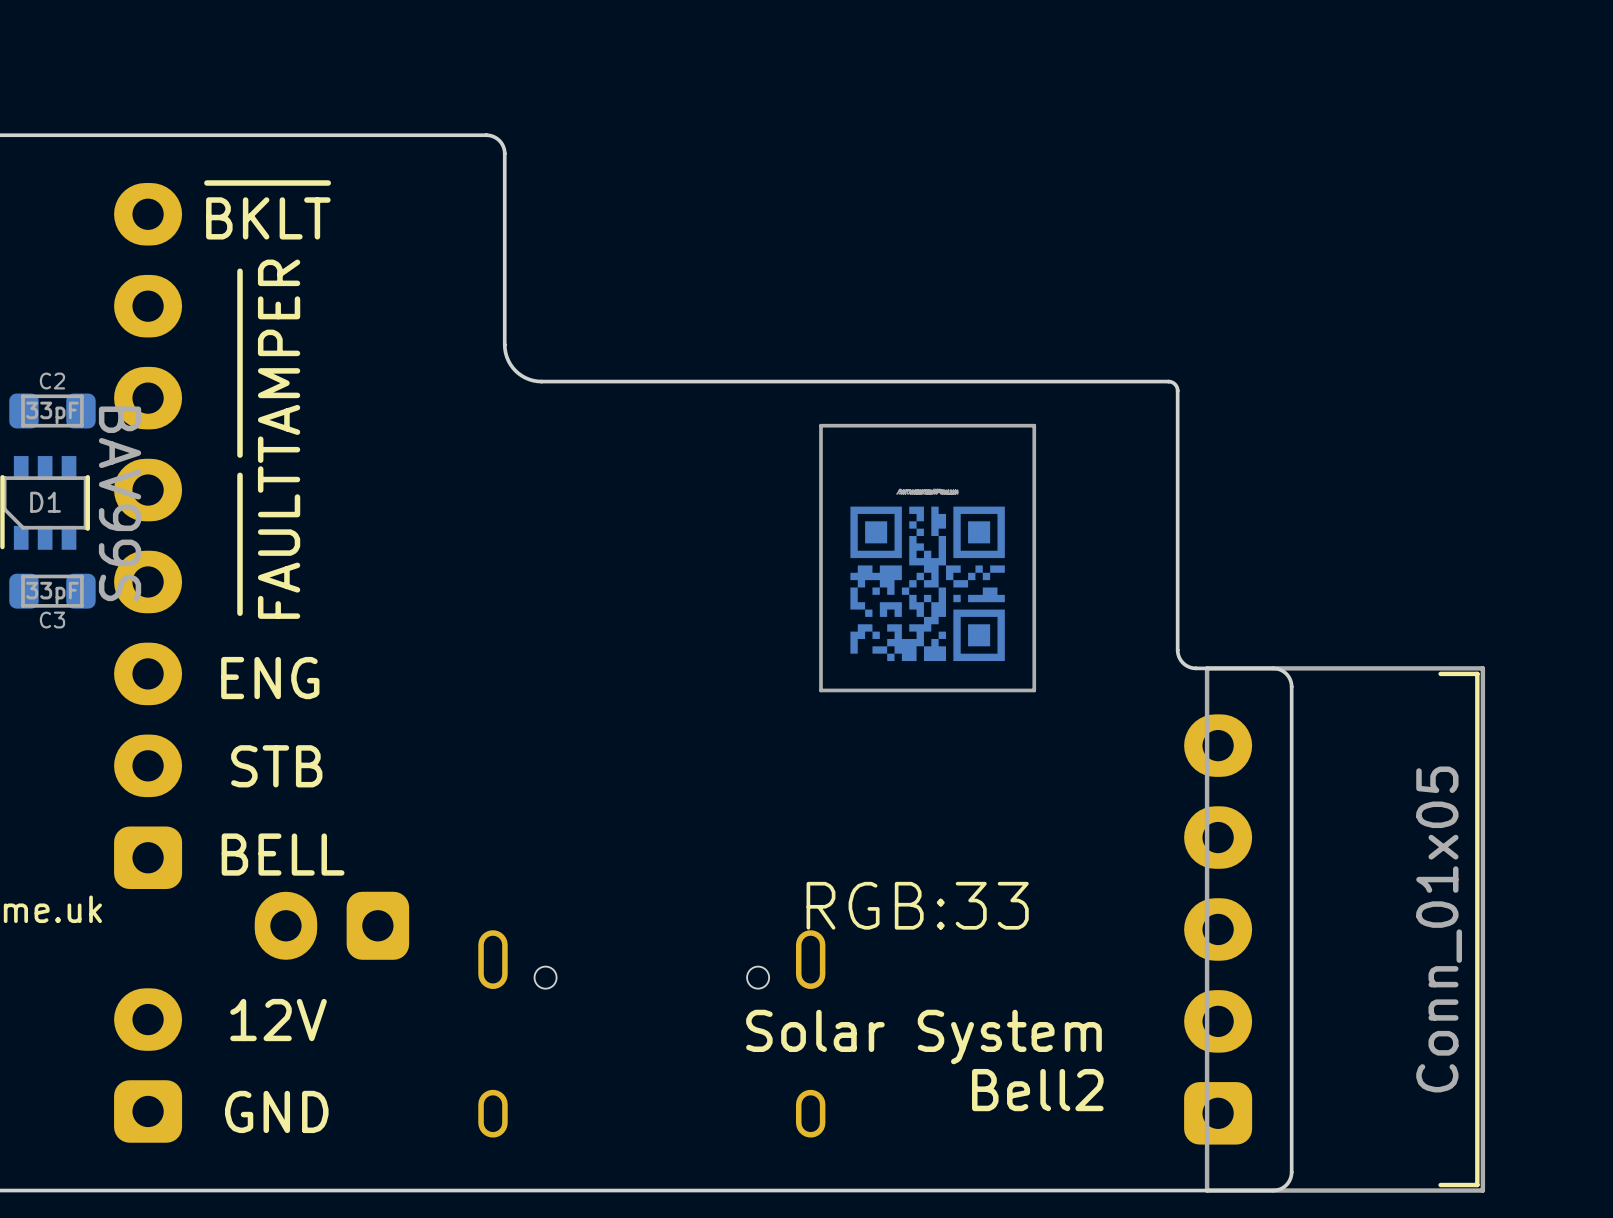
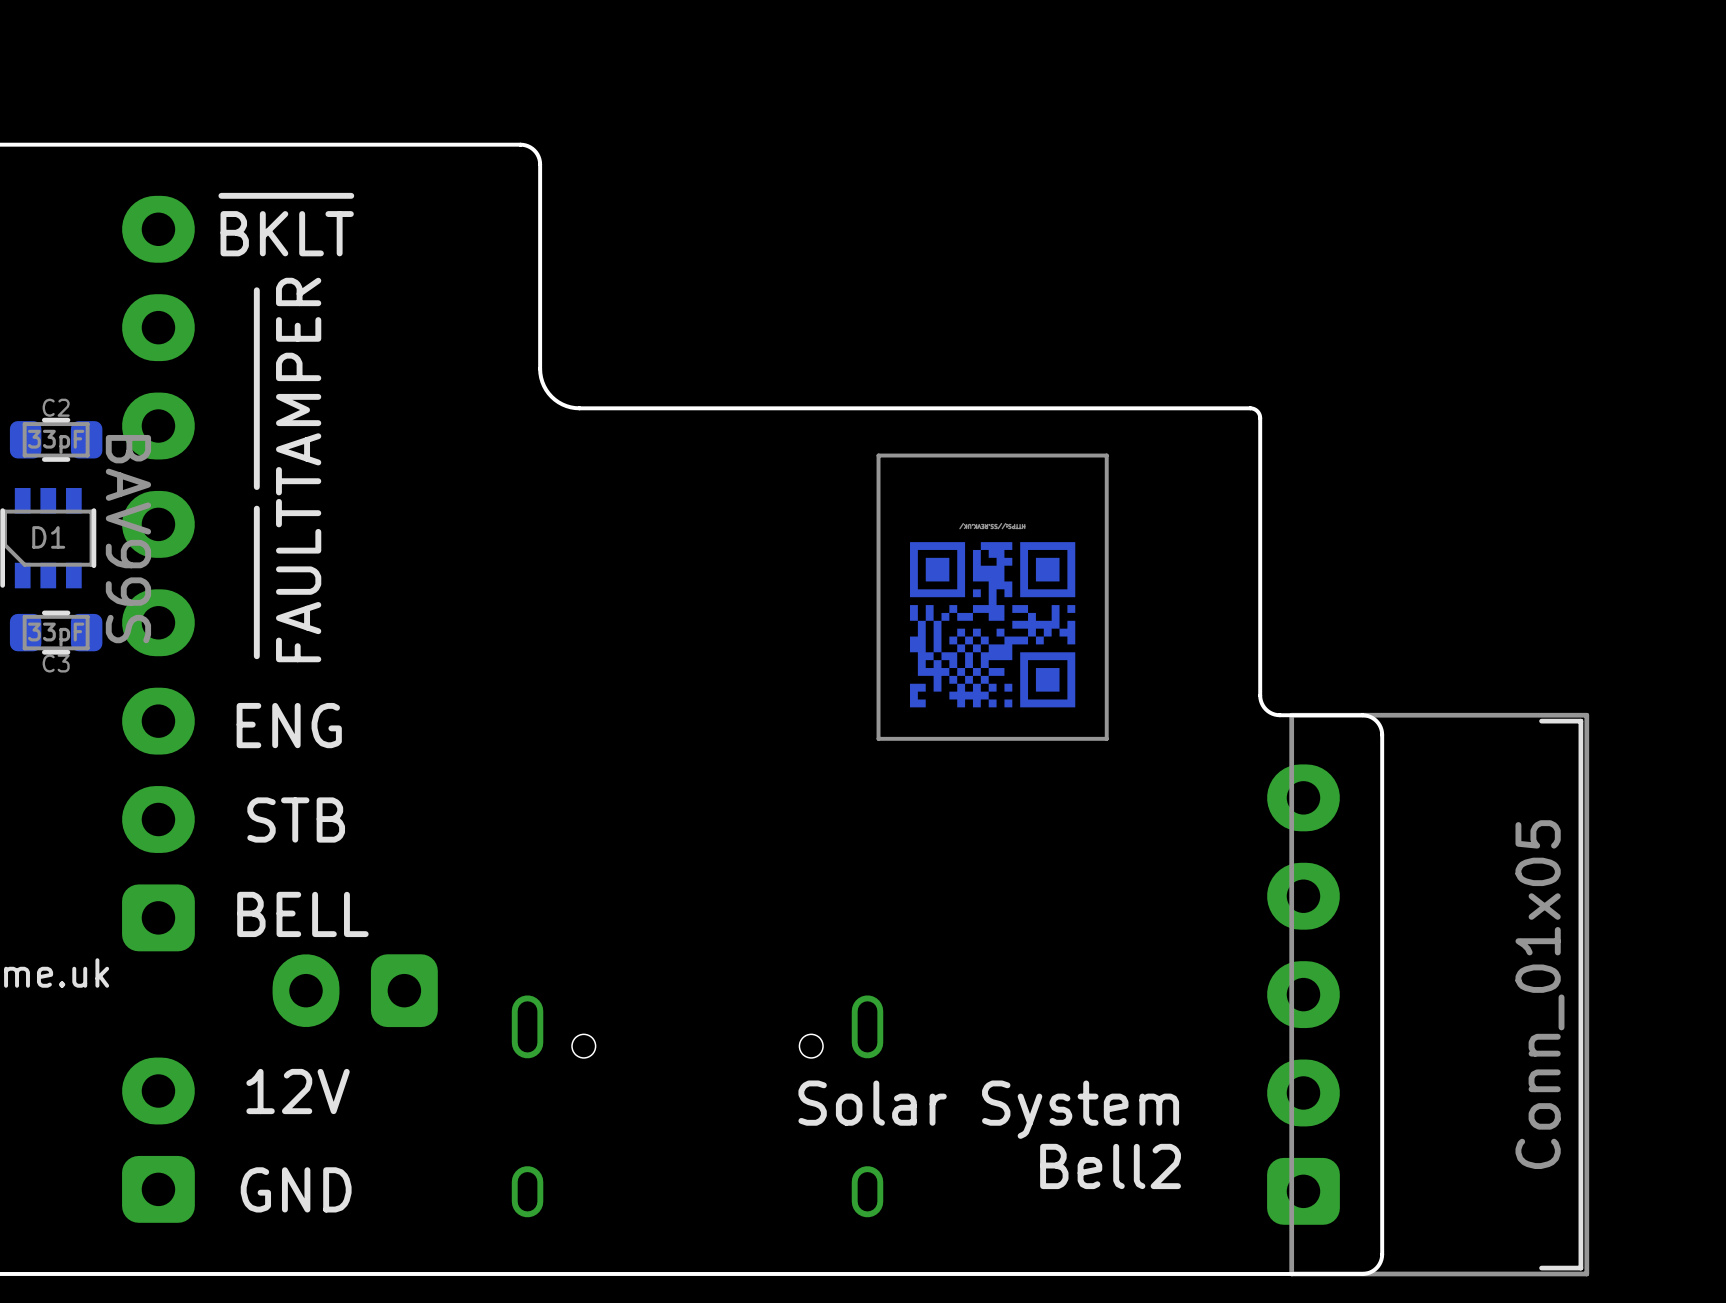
C2 footprint: [9, 393, 96, 429] -> [9, 417, 103, 462]
part footprint: [819, 423, 1037, 693] -> [876, 453, 1109, 741]
C3 footprint: [9, 573, 96, 609] -> [9, 610, 103, 655]
text: RGB:33 (917, 905) -> none

